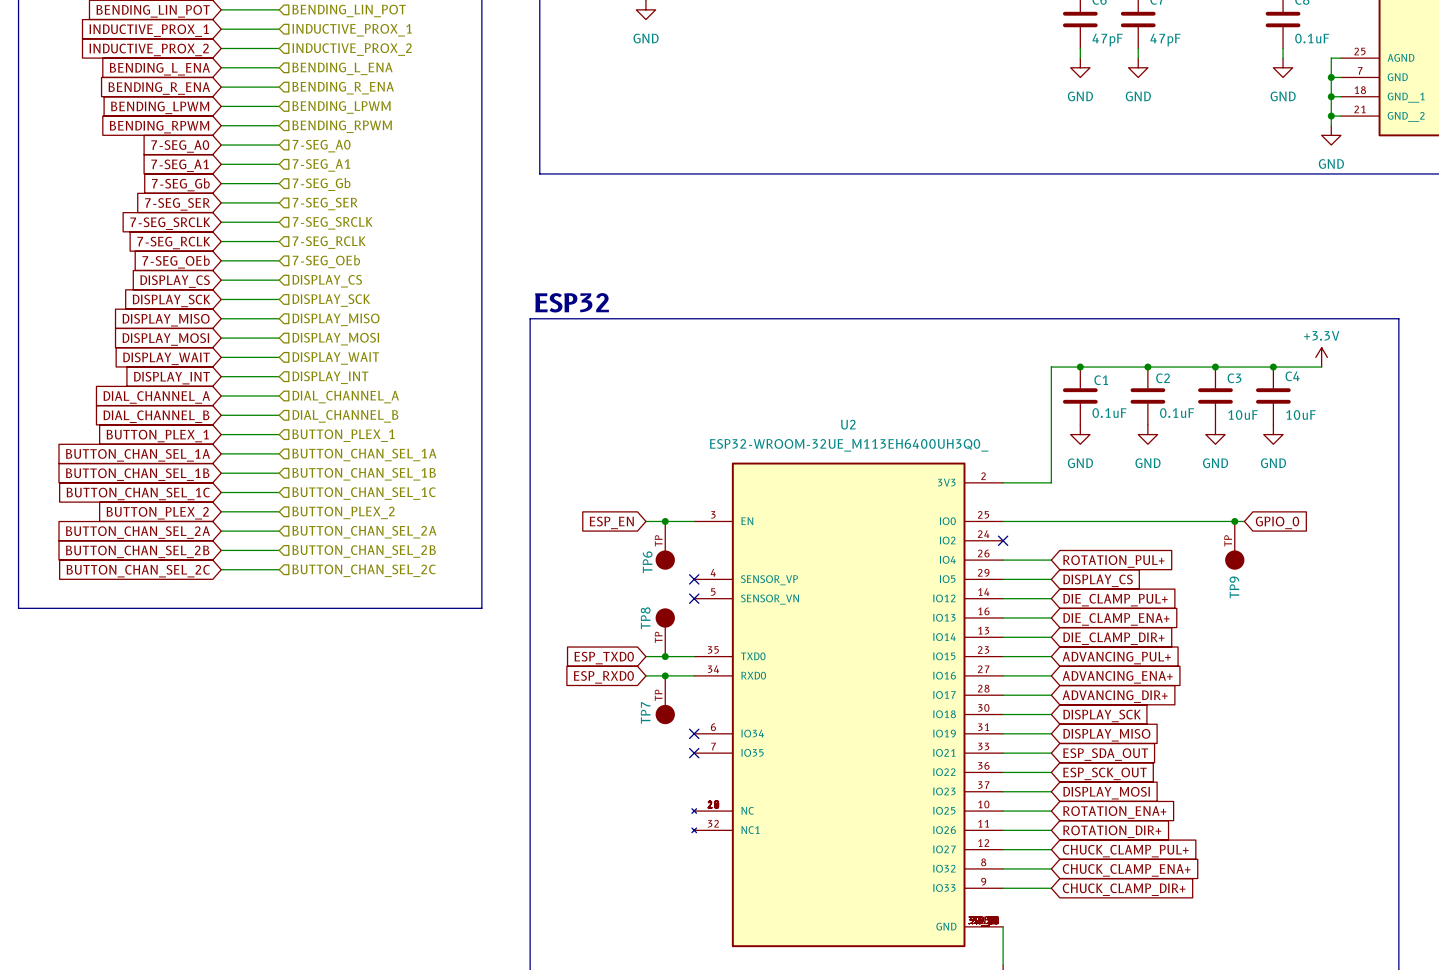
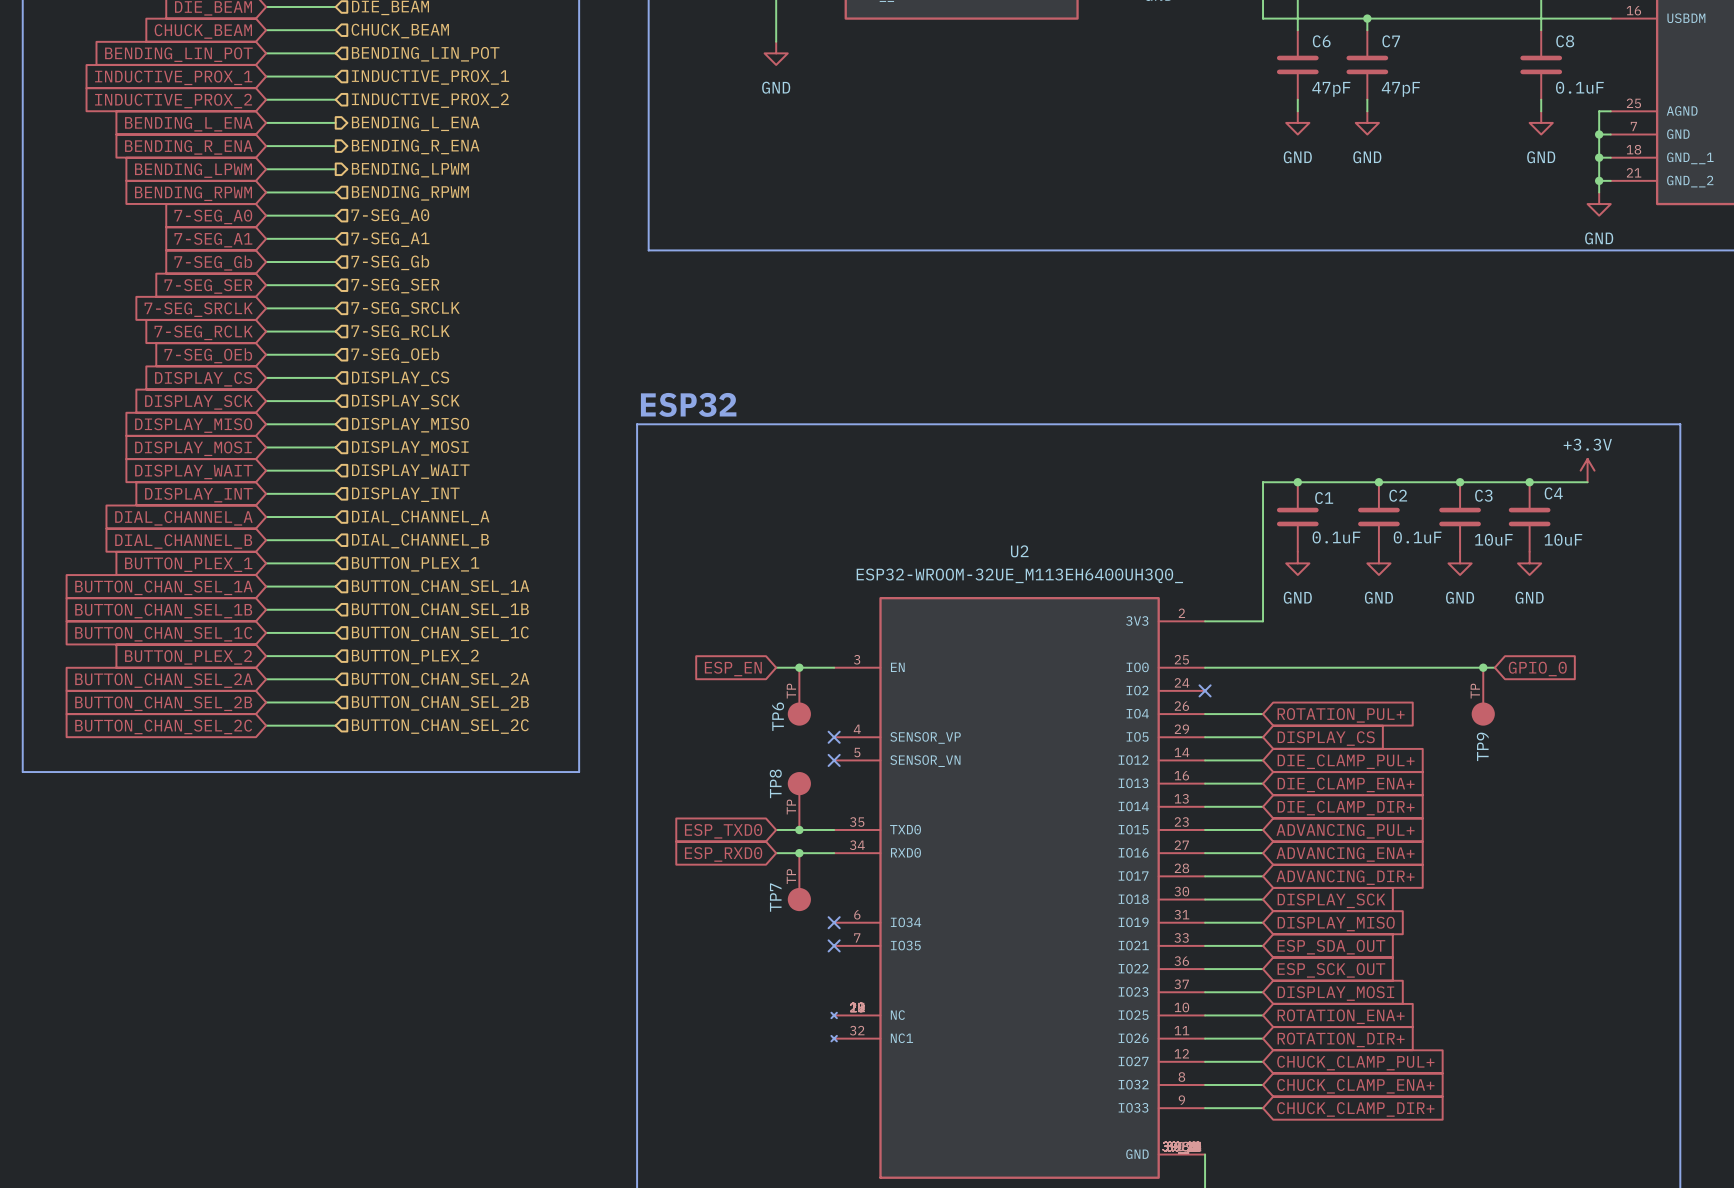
hierarchical label shape: input (342, 68) -> output (415, 123)
hierarchical label shape: input (343, 88) -> output (415, 146)
hierarchical label shape: input (341, 107) -> output (410, 170)

